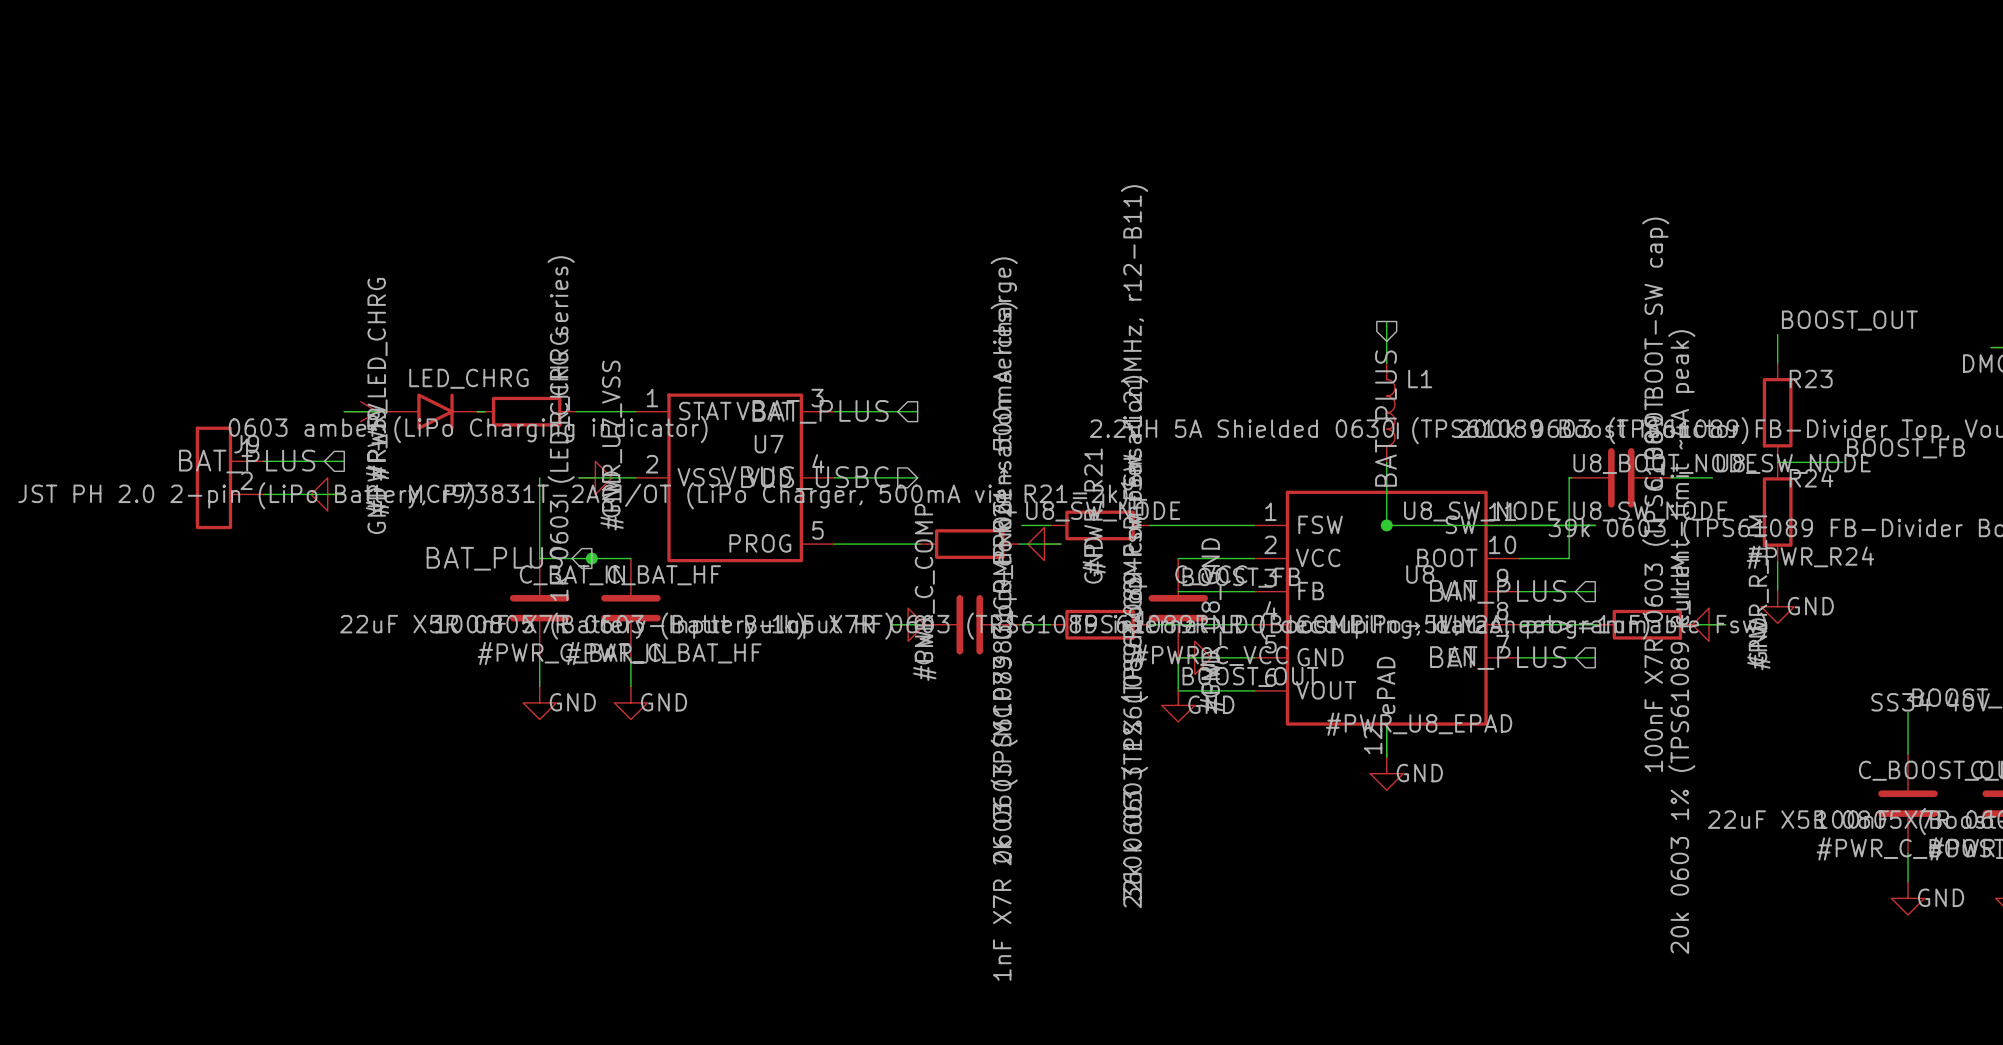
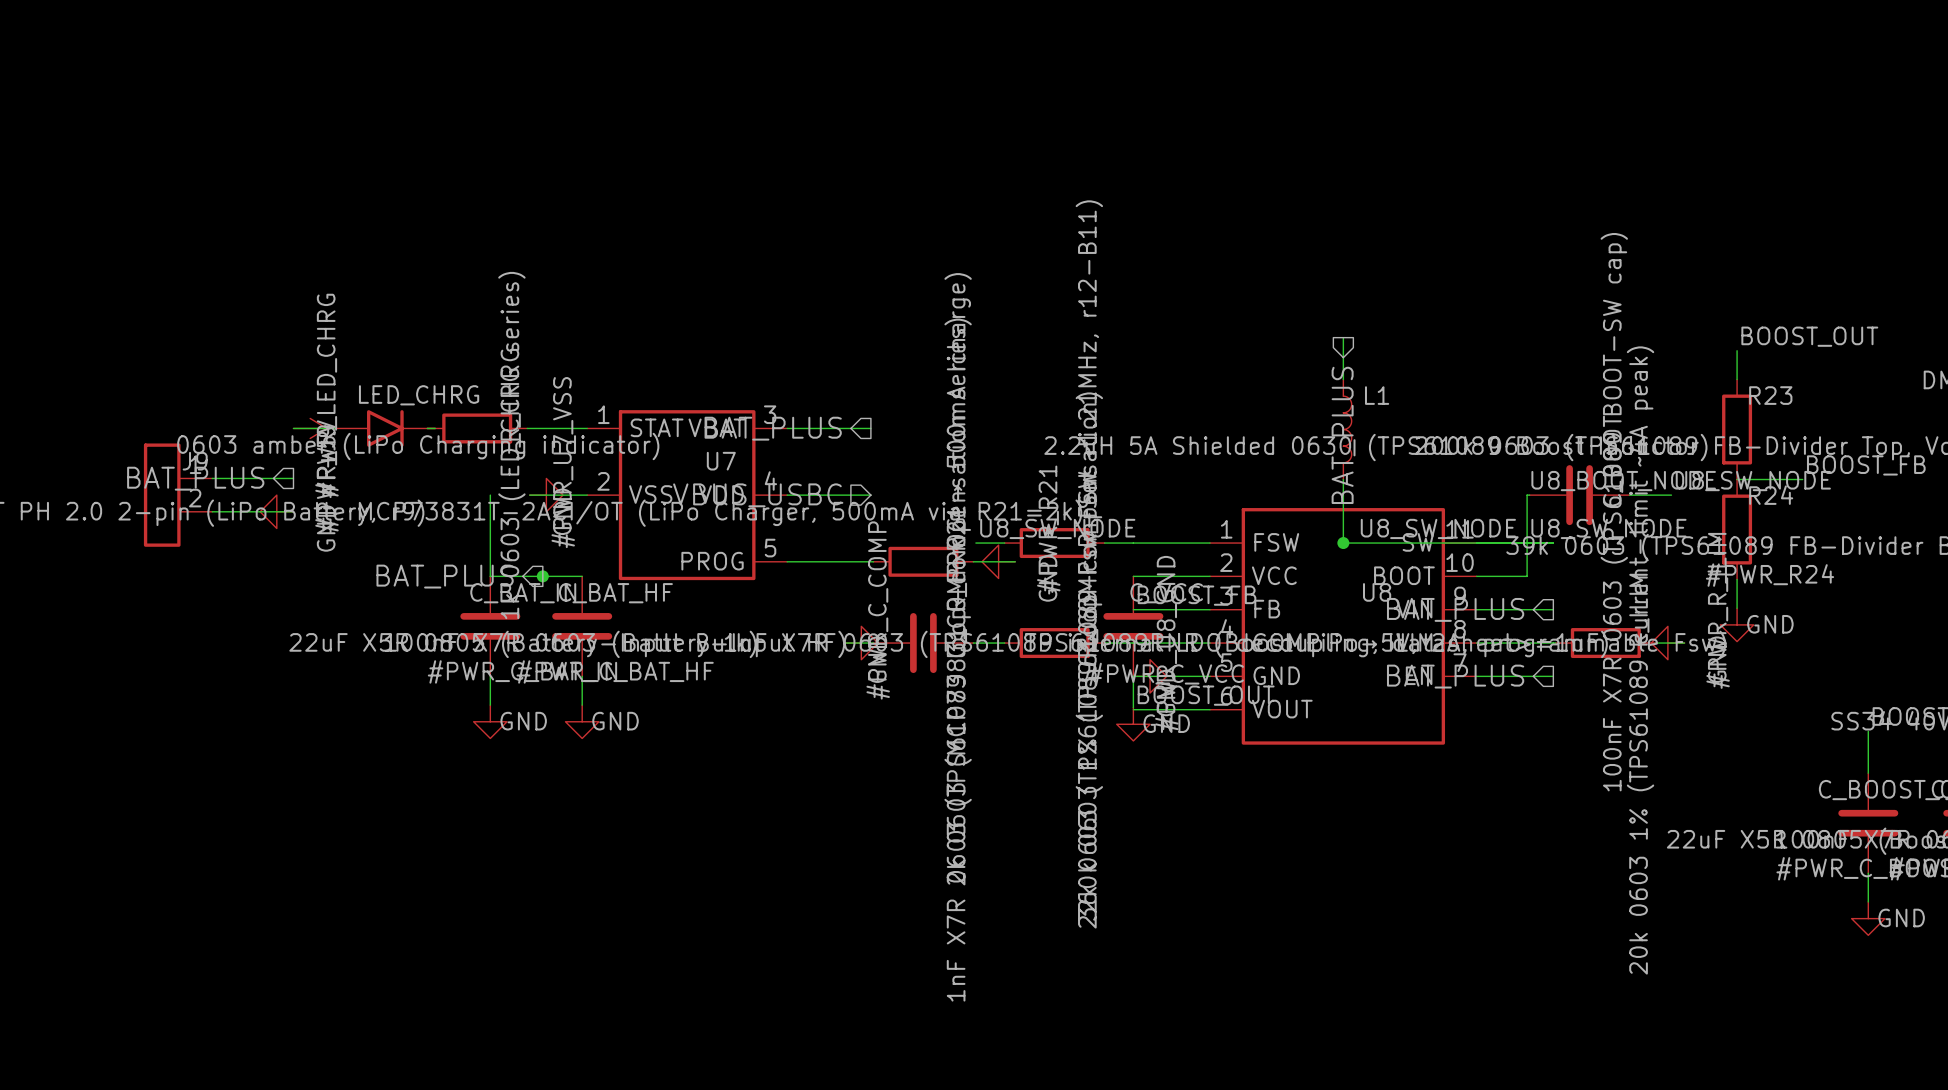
U8 symbol: [1254, 490, 1520, 758] -> [1210, 508, 1477, 745]
wire: (1386, 724) (1386, 757) -> none
#PWR_U8_EPAD: GND (1386, 773) -> none

